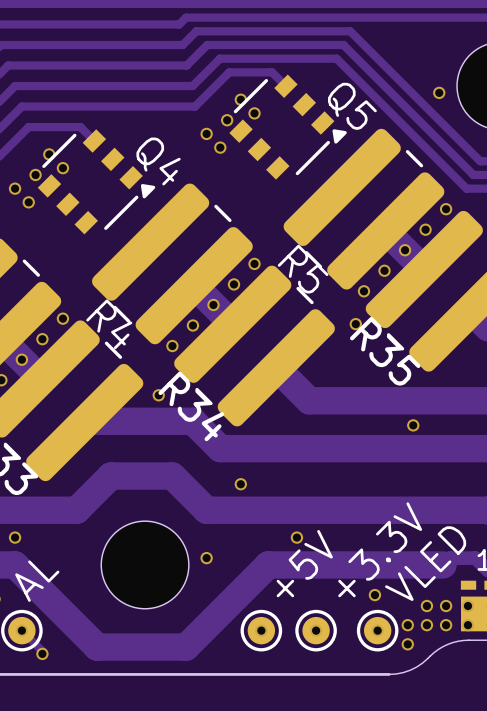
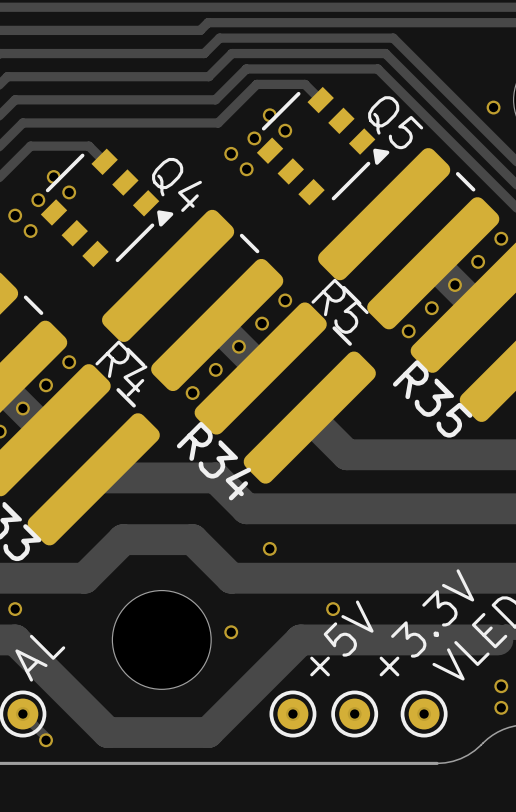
via: (355, 324) -> none
via: (158, 395) -> none
via: (413, 425) -> none
via: (374, 595) -> none
via: (426, 606) -> none
via: (407, 625) -> none
via: (426, 625) -> none
via: (407, 644) -> none

